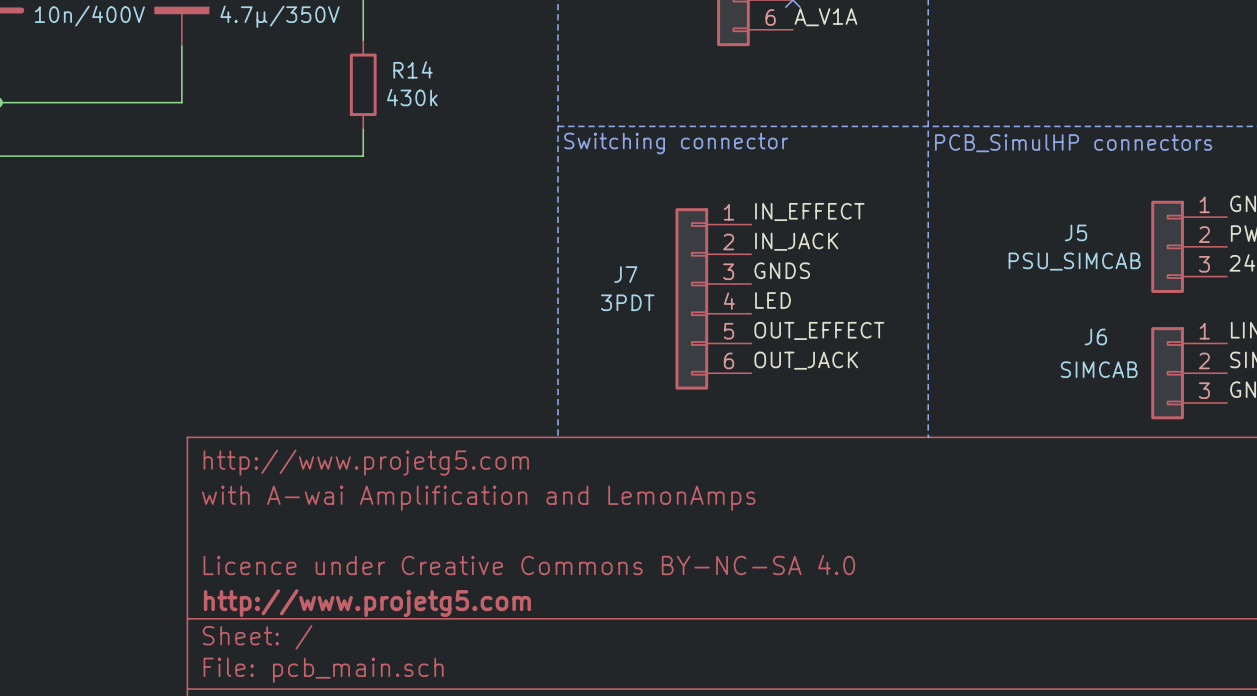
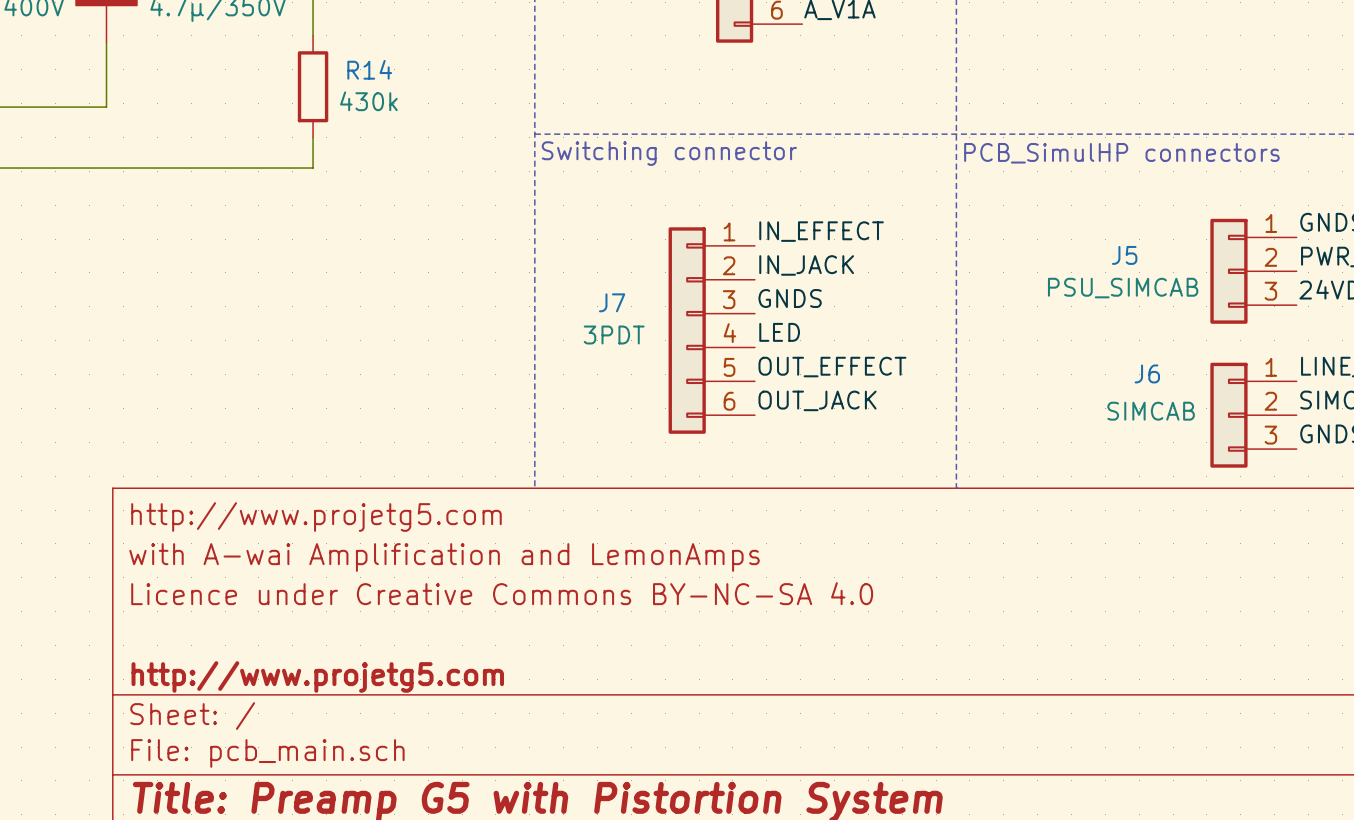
title block position: Licence under Creative Commons BY-NC-SA 4.0 (529, 565) -> Licence under Creative Commons BY-NC-SA 4.0 (502, 593)

